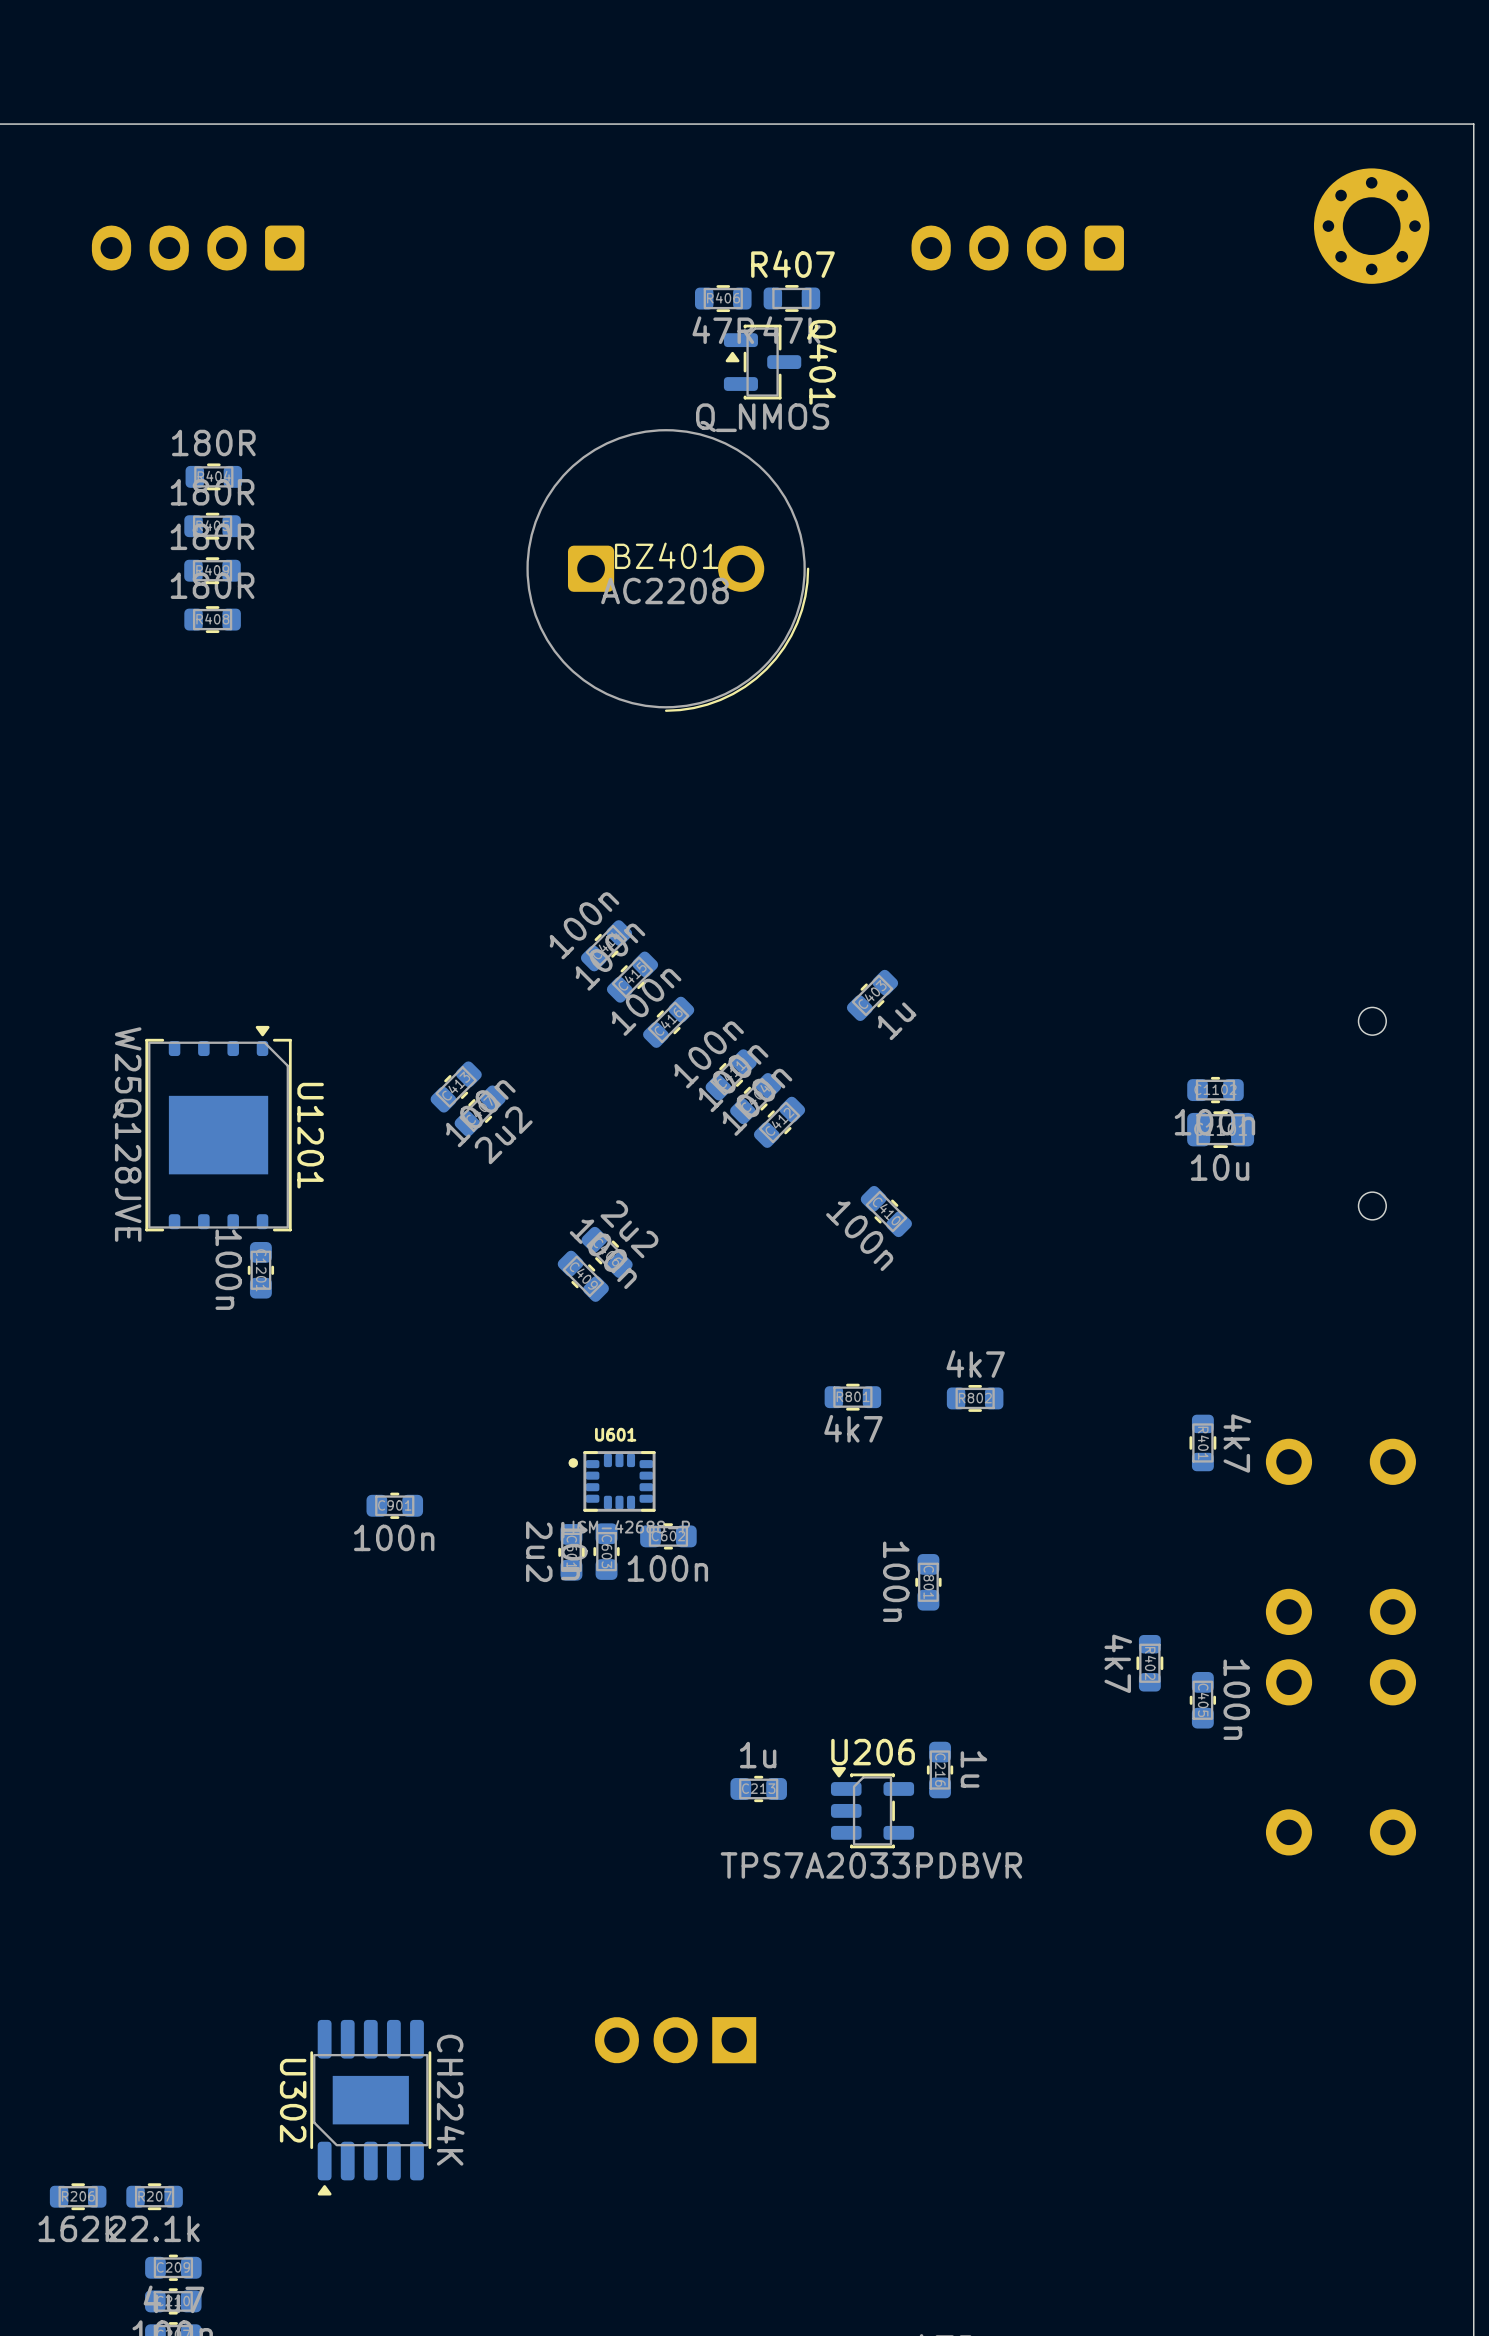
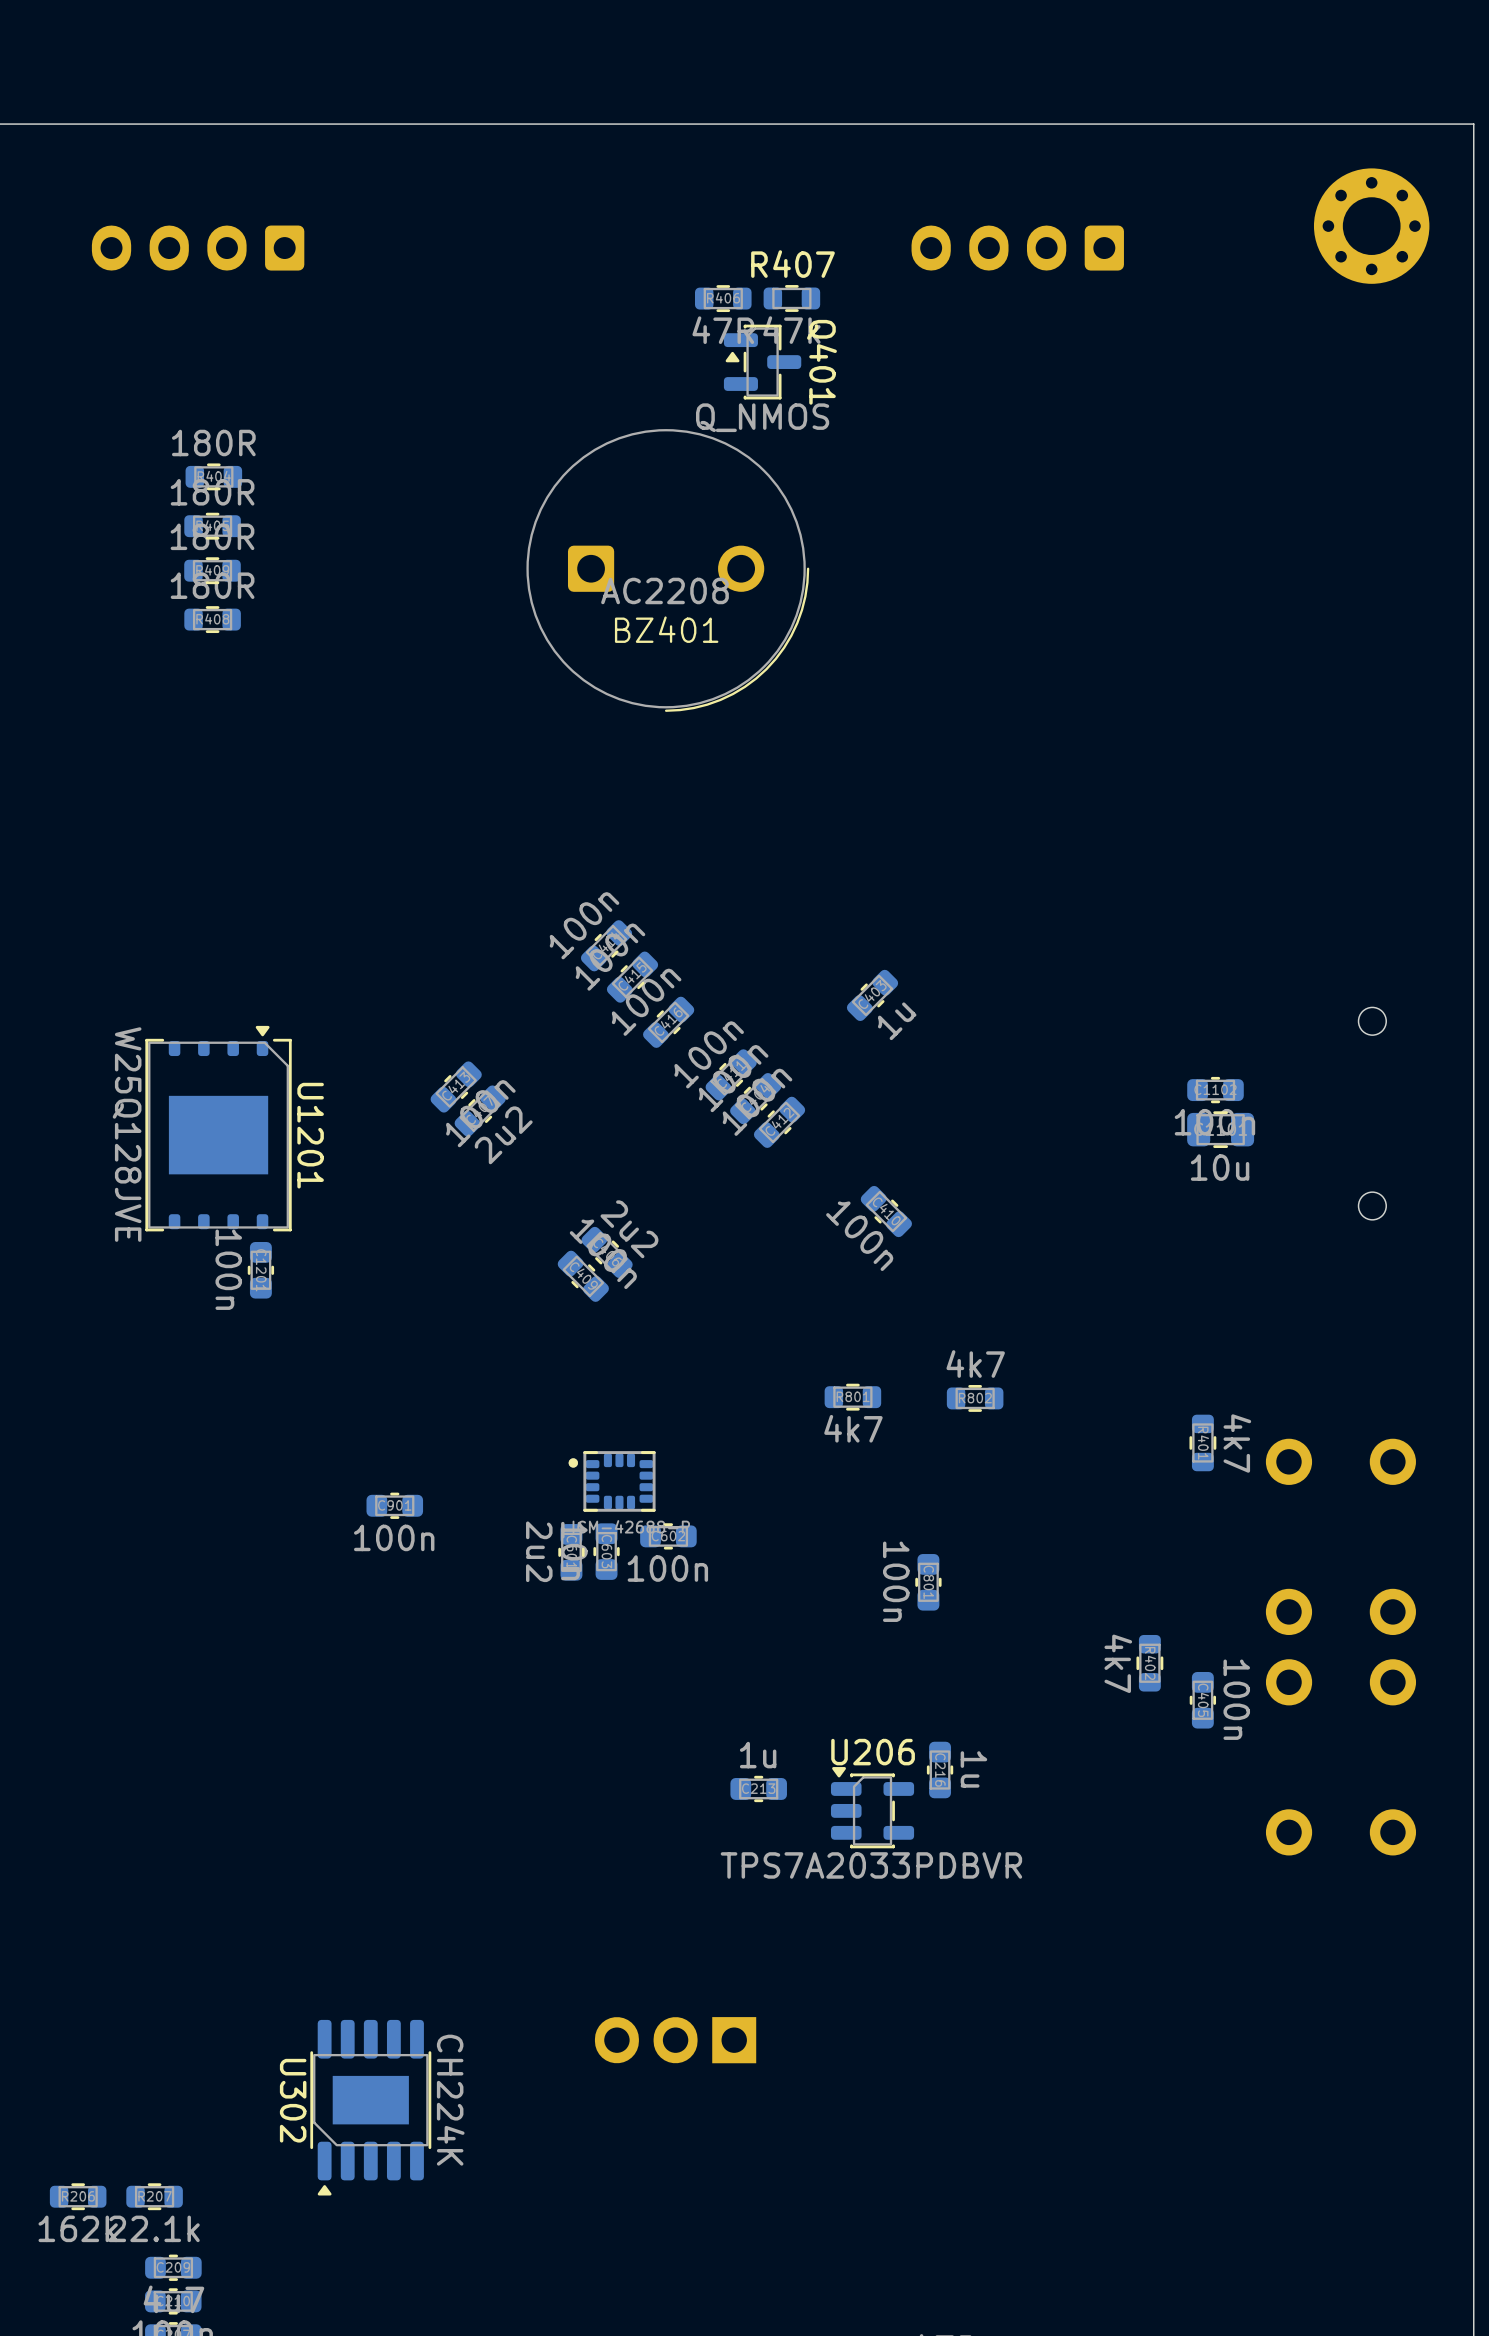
BZ401 name position: BZ401 (666, 555) -> BZ401 (666, 629)
U601 name: U601 (615, 1434) -> none

